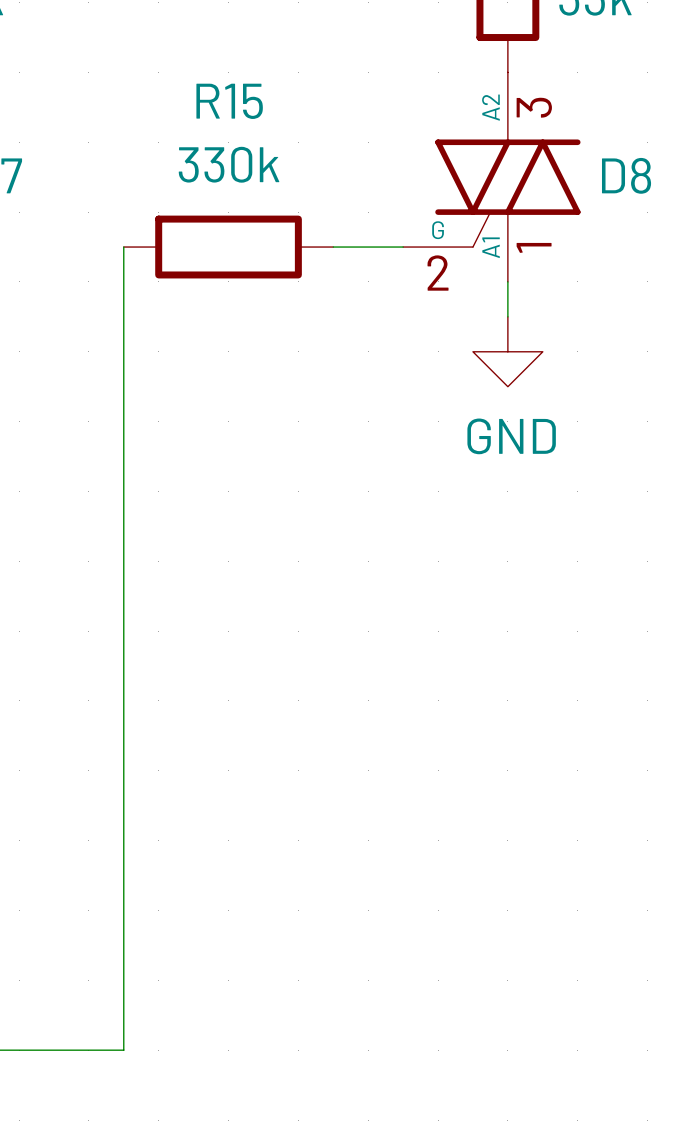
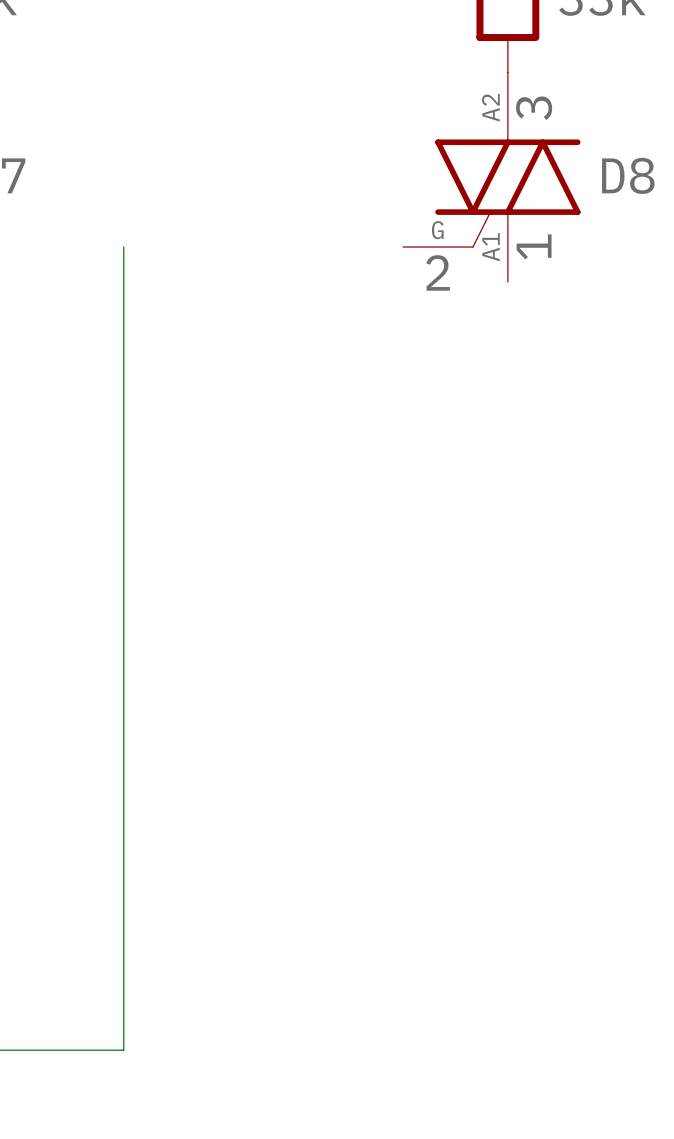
R15: 330k (228, 247) -> none
wire: (333, 247) (403, 247) -> none
wire: (507, 281) (507, 316) -> none
power symbol: GND (507, 351) -> none

